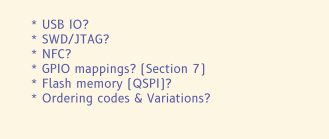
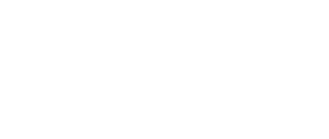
text: * USB IO? (60, 24) -> none
text: * SWD/JTAG? (70, 38) -> none
text: * NFC? (51, 53) -> none
text: * GPIO mappings? (Section 7) (118, 69) -> none
text: * Flash memory (QSPI)? (101, 84) -> none
text: * Ordering codes & Variations? (120, 99) -> none

